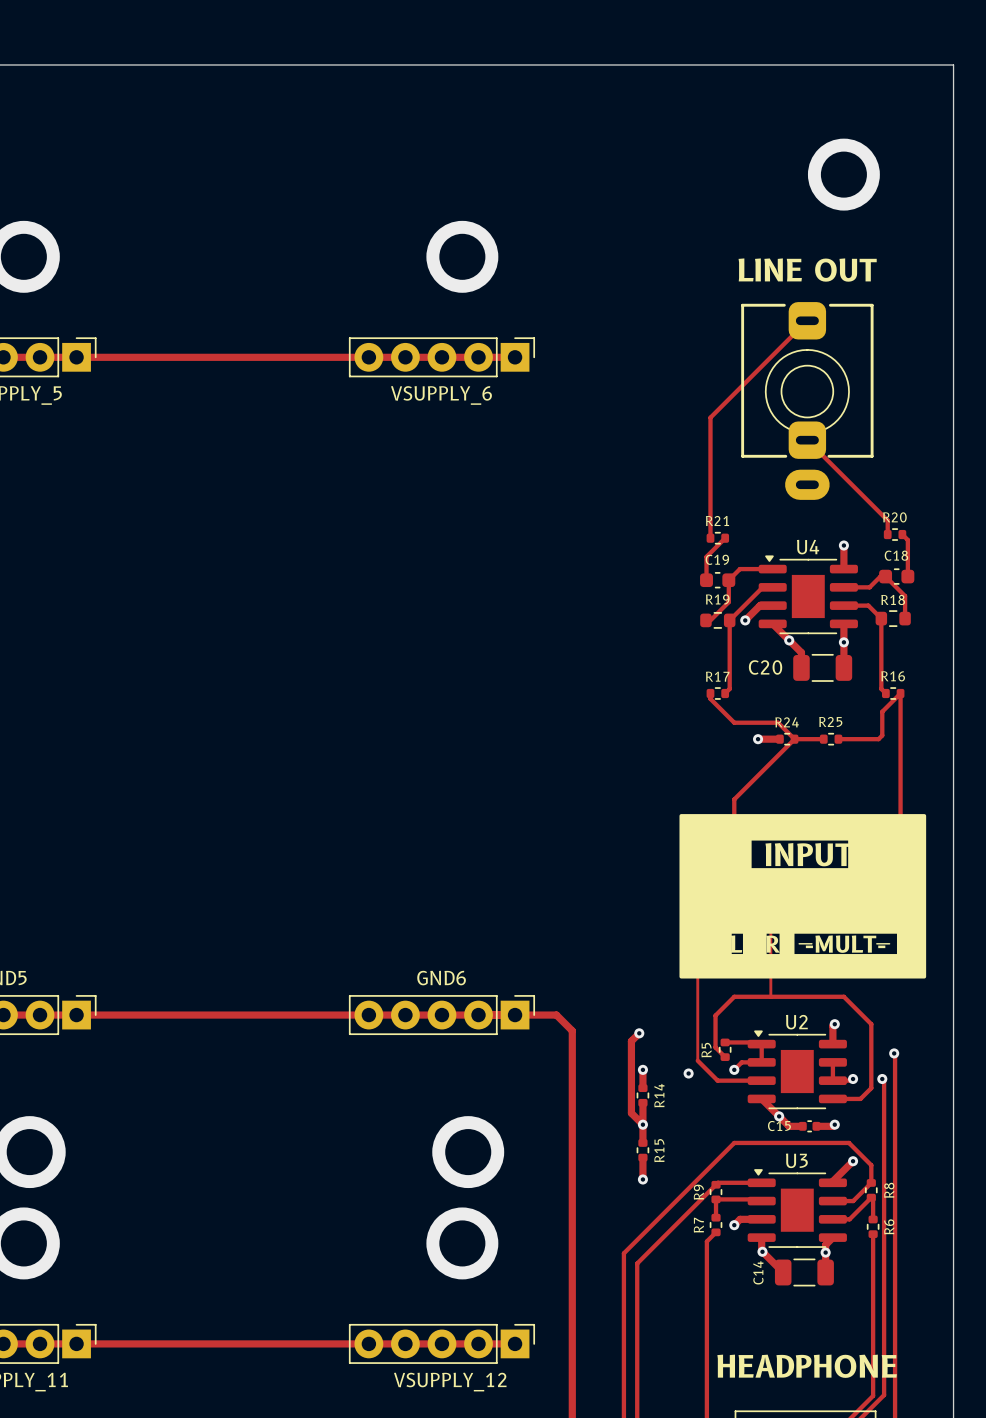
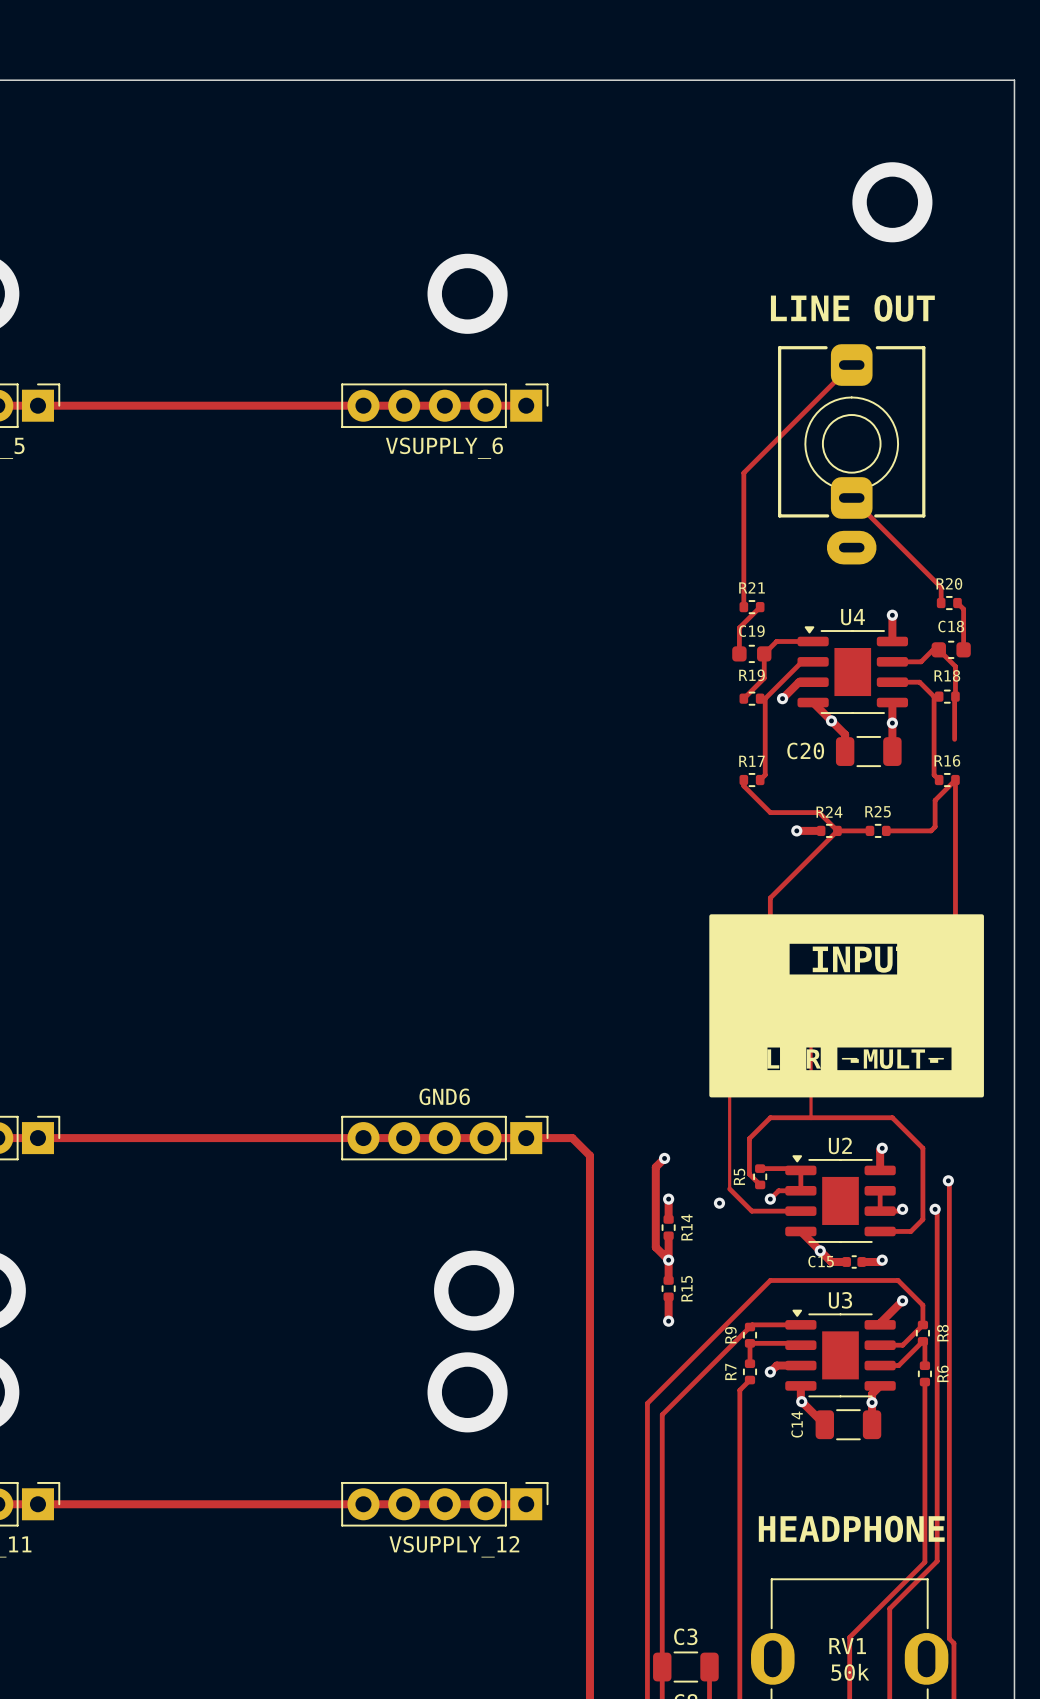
track: (900, 591) (905, 596) (905, 618) -> (955, 666) (954, 739)
R18 footprint: [875, 610, 911, 627] -> [934, 689, 960, 704]
R19 footprint: [700, 612, 736, 629] -> [739, 691, 765, 706]

